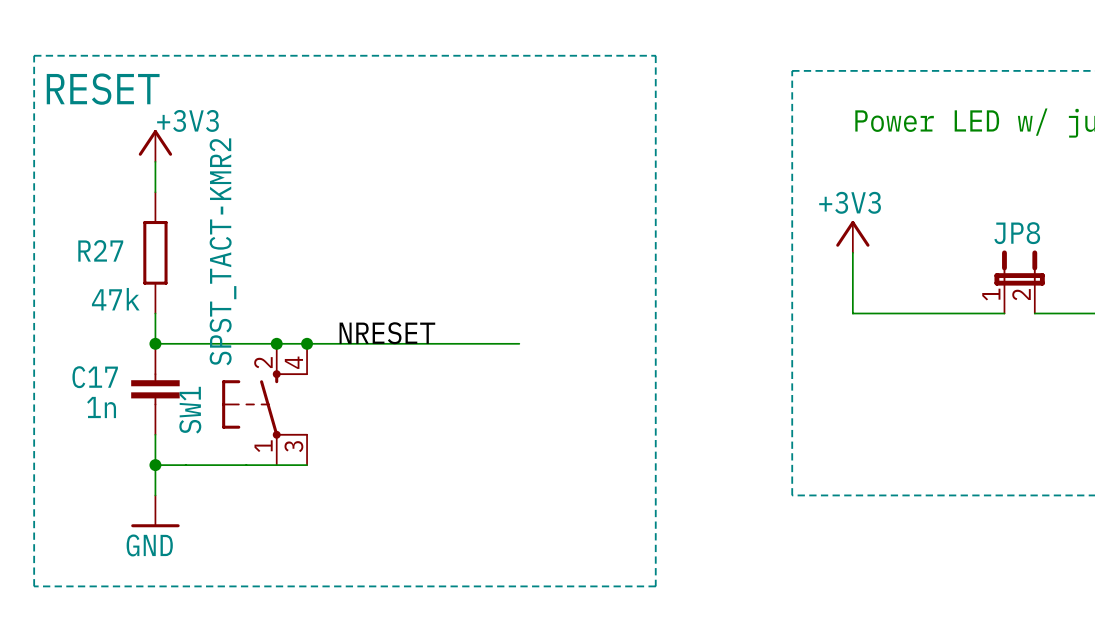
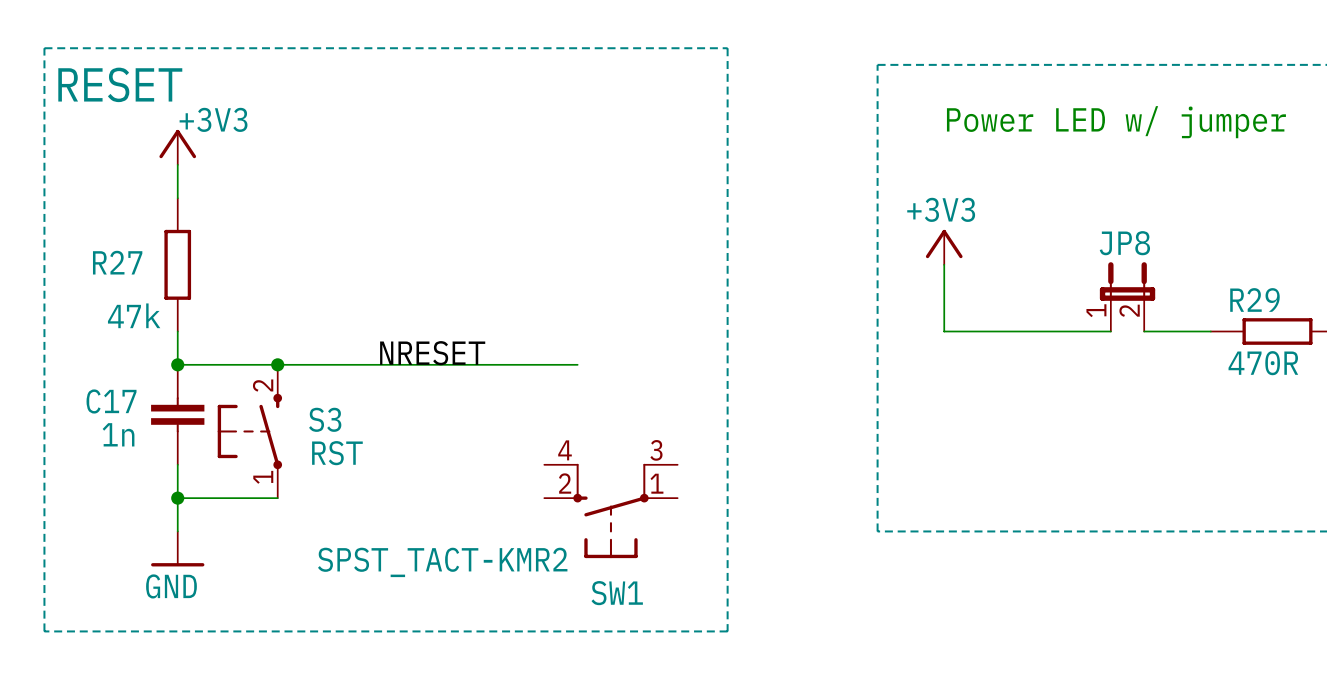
junction: none -> (277, 364)
junction: (276, 343) -> none
junction: (307, 343) -> none
S3: none -> RST (249, 431)
SW1 rotation: 0° (265, 404) -> 90° counterclockwise (610, 510)
SW1 position: (265, 404) -> (610, 510)
wire: (246, 465) (307, 465) -> none

